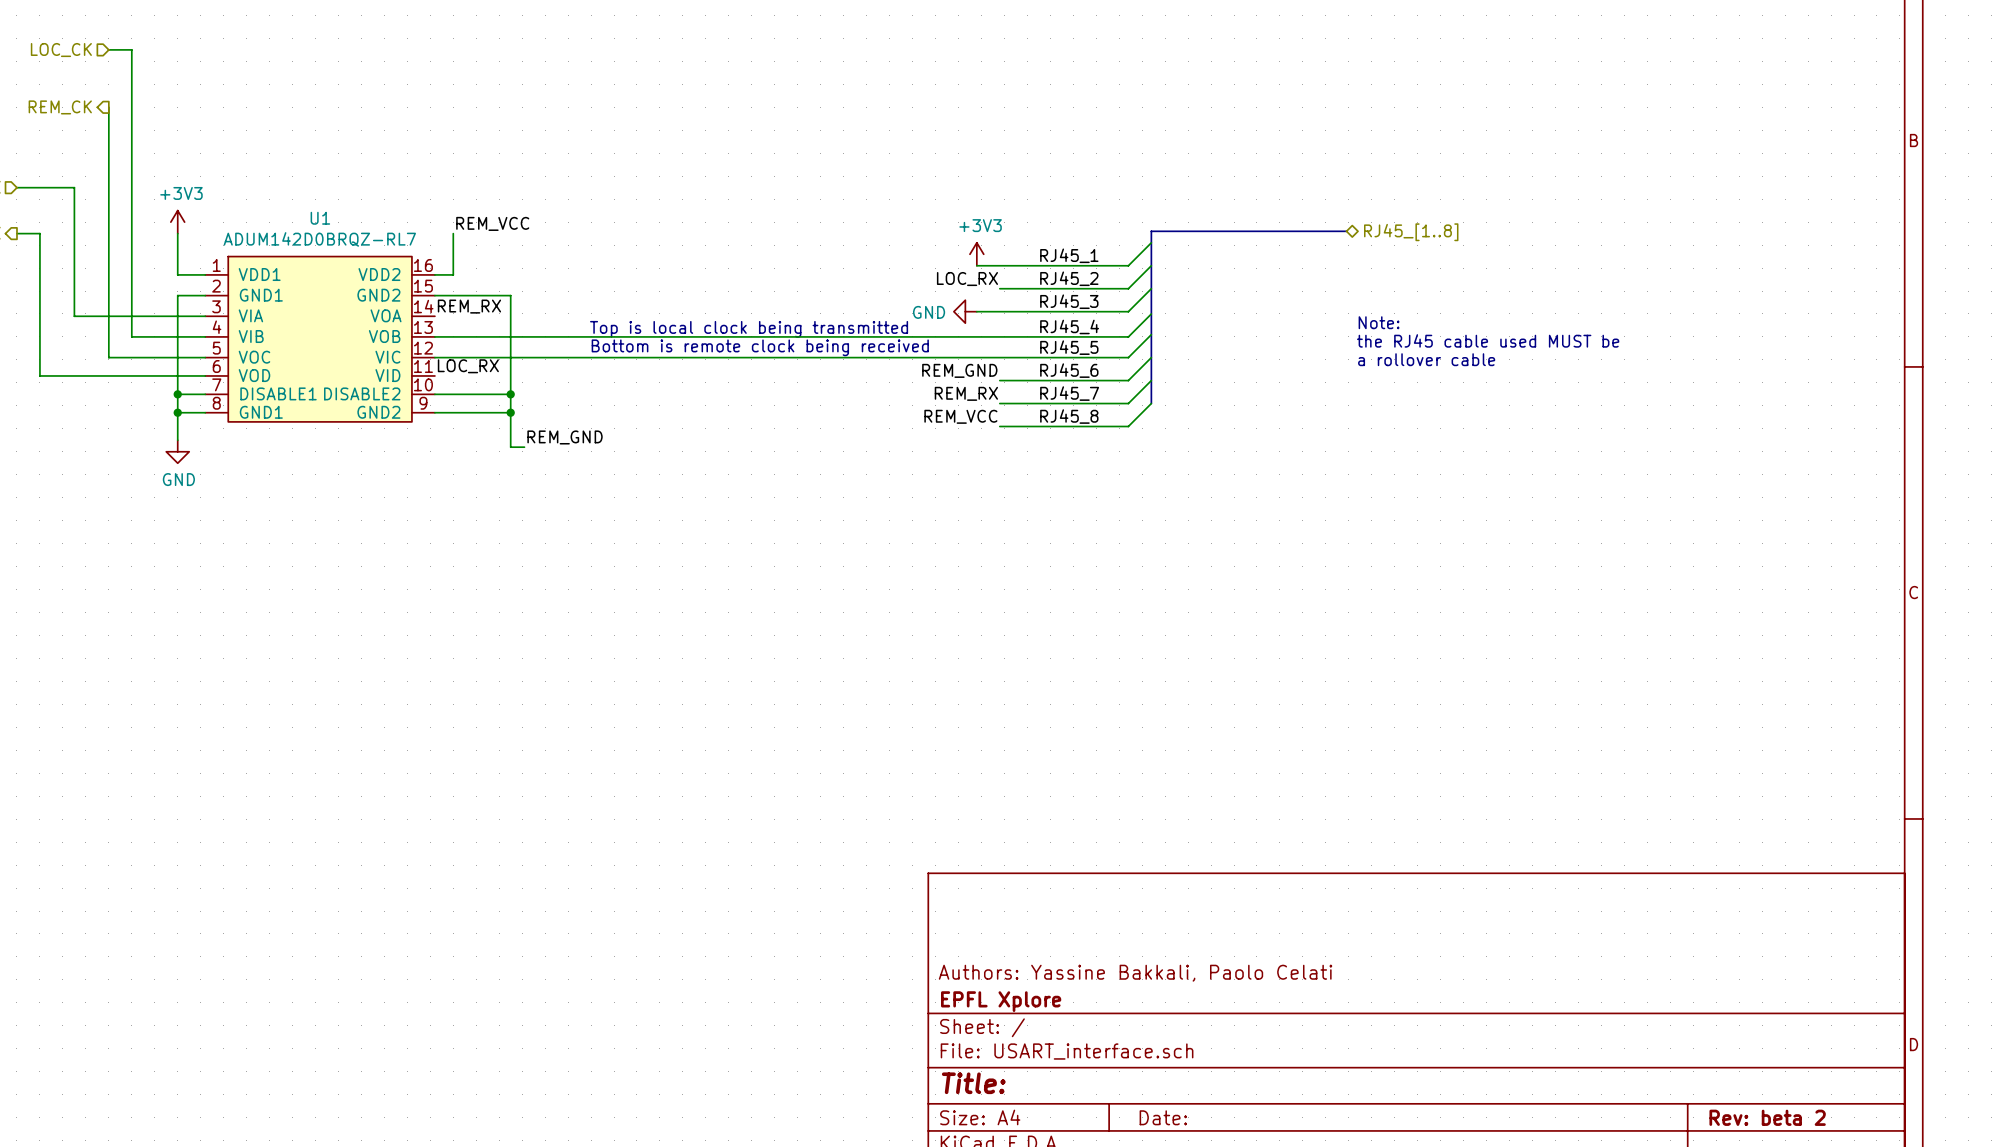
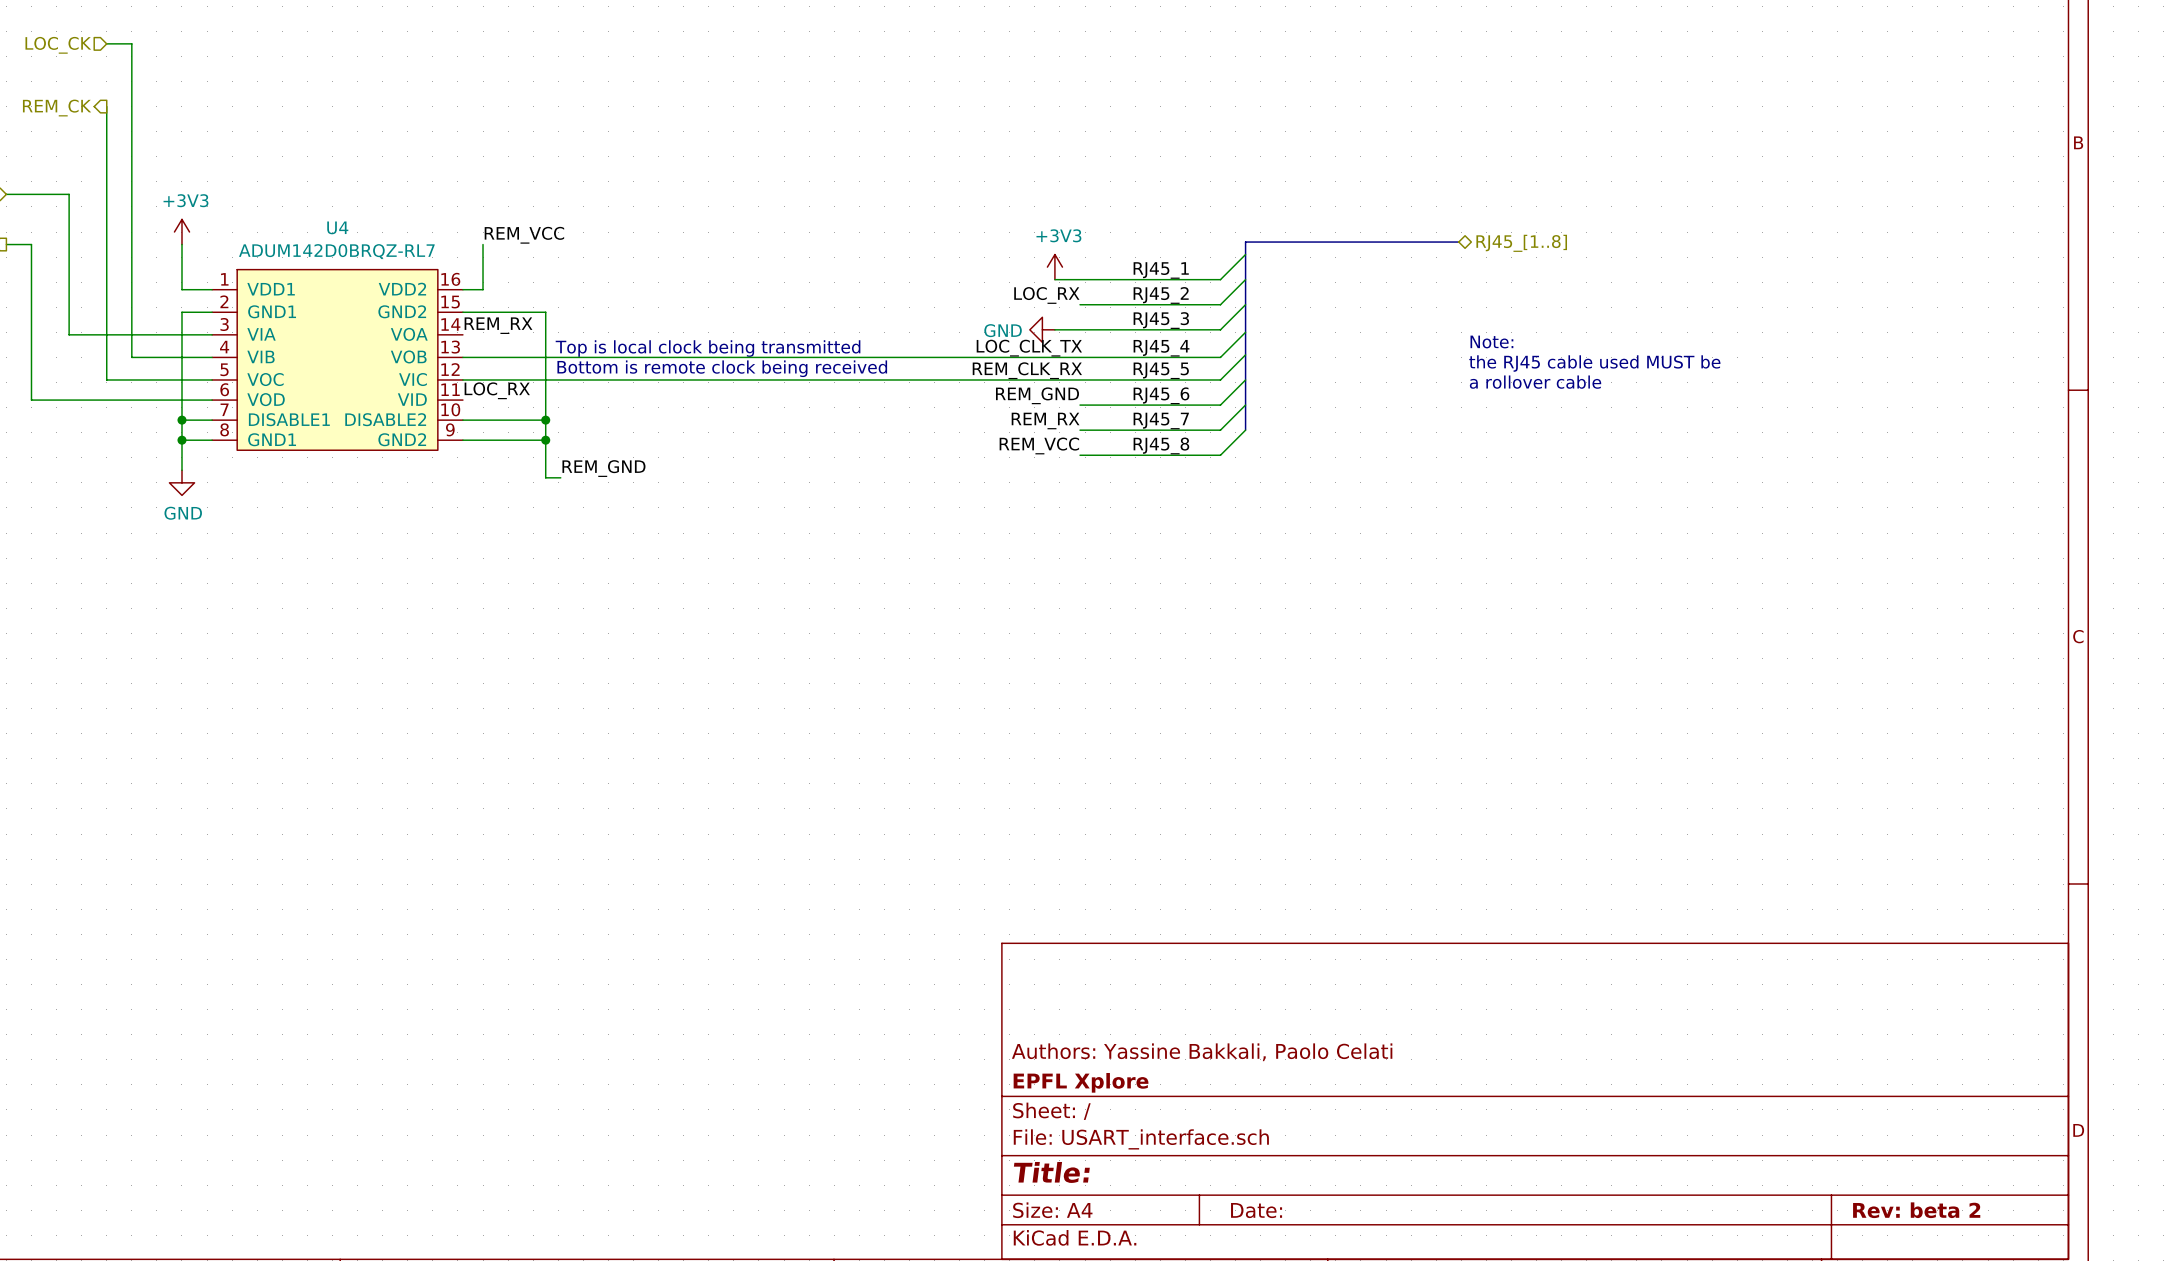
U1 name: U1 (320, 218) -> U4 (337, 227)
label: none -> LOC_CLK_TX (1029, 348)
text position: Top is local clock being transmitted (749, 329) -> Top is local clock being transmitted (708, 348)
text position: Bottom is remote clock being received (760, 347) -> Bottom is remote clock being received (722, 368)
label: none -> REM_CLK_RX (1027, 370)

